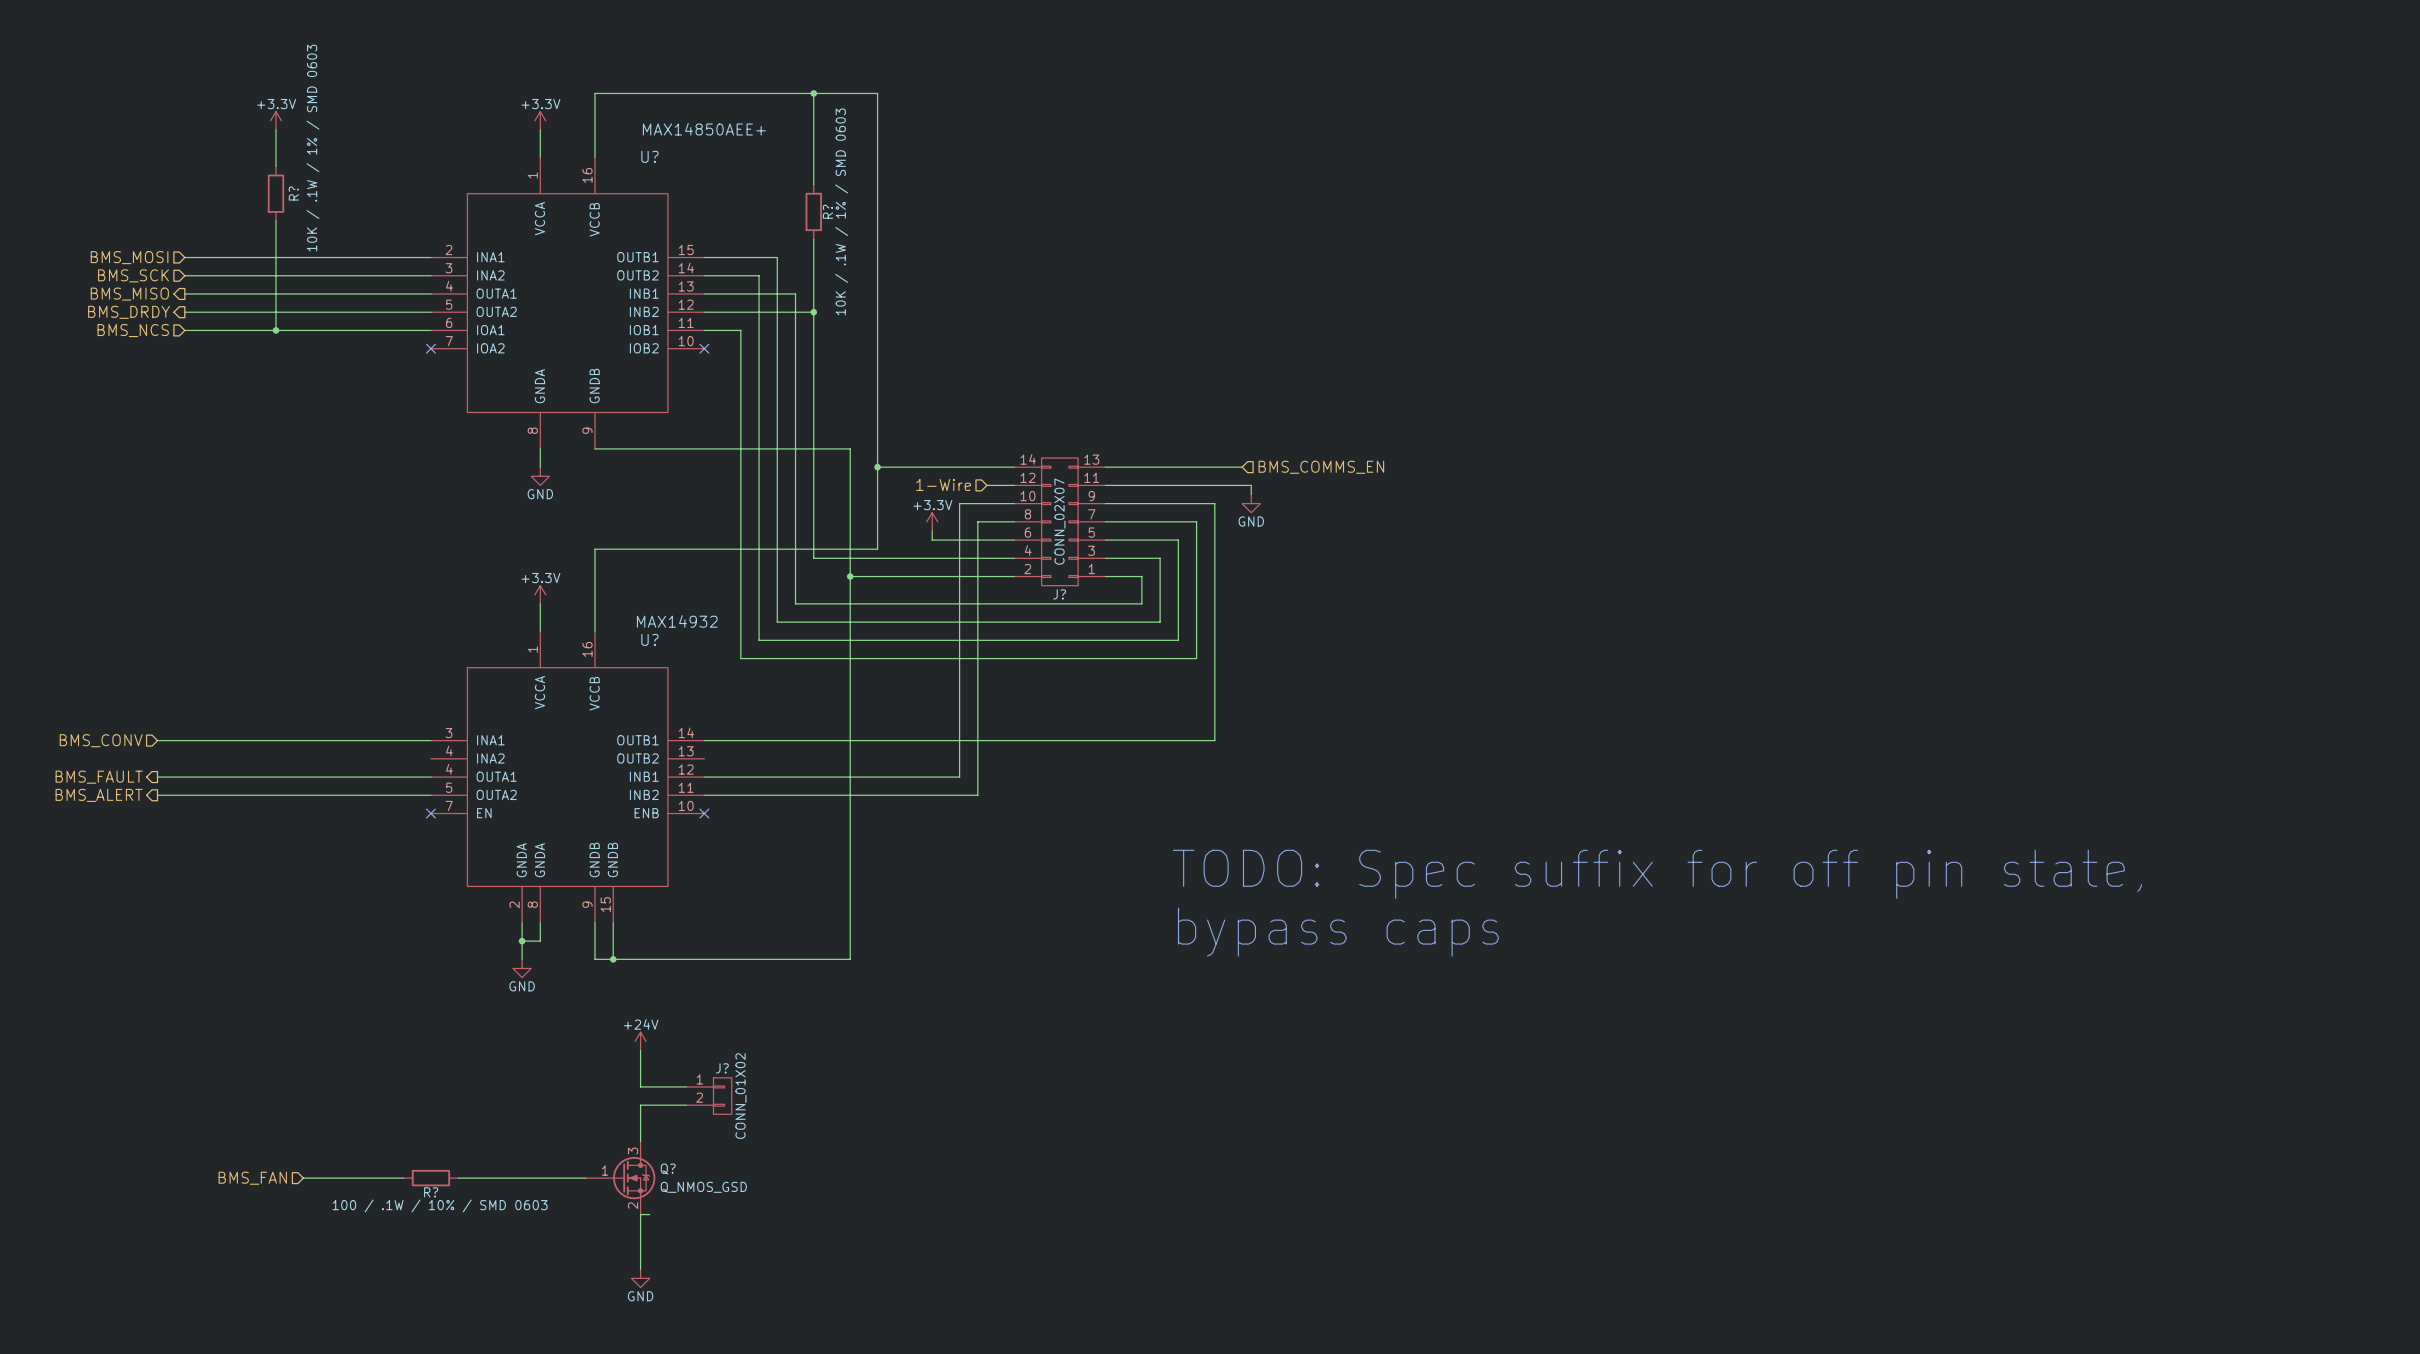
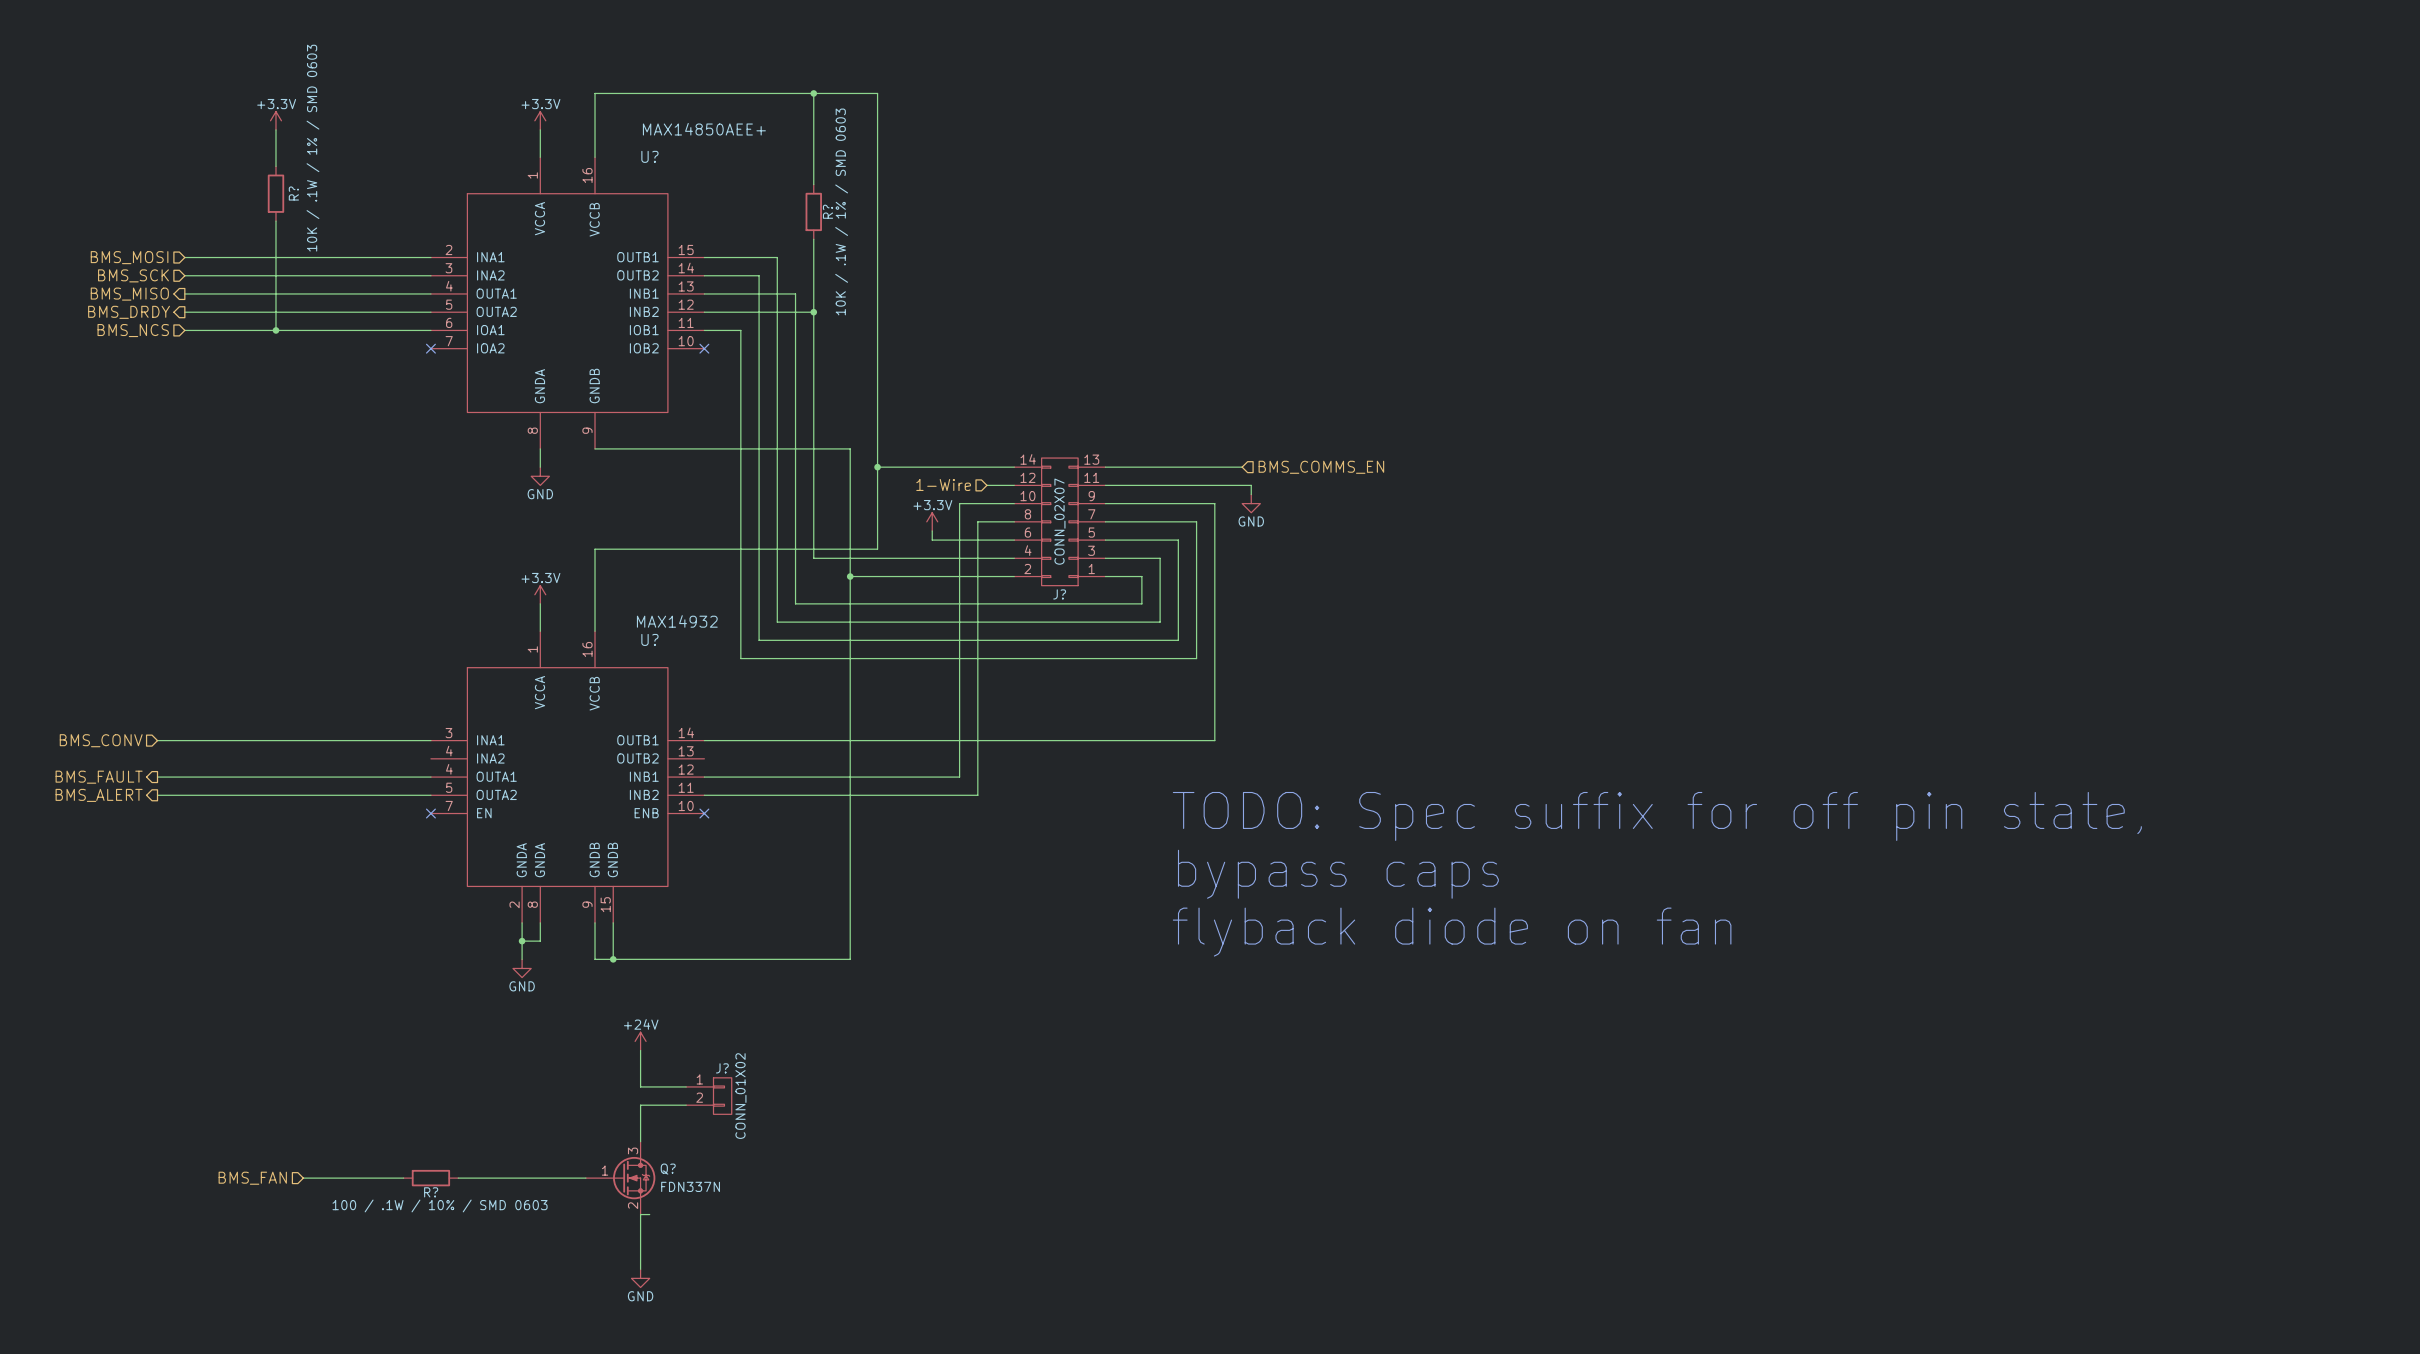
text: none -> TODO: Spec suffix for off pin state, (1657, 816)
text: TODO: Spec suffix for off pin state, (1657, 874) -> bypass caps (1338, 874)
text: bypass caps (1338, 932) -> flyback diode on fan (1452, 932)
Q? value: Q_NMOS_GSD (703, 1187) -> FDN337N (690, 1186)

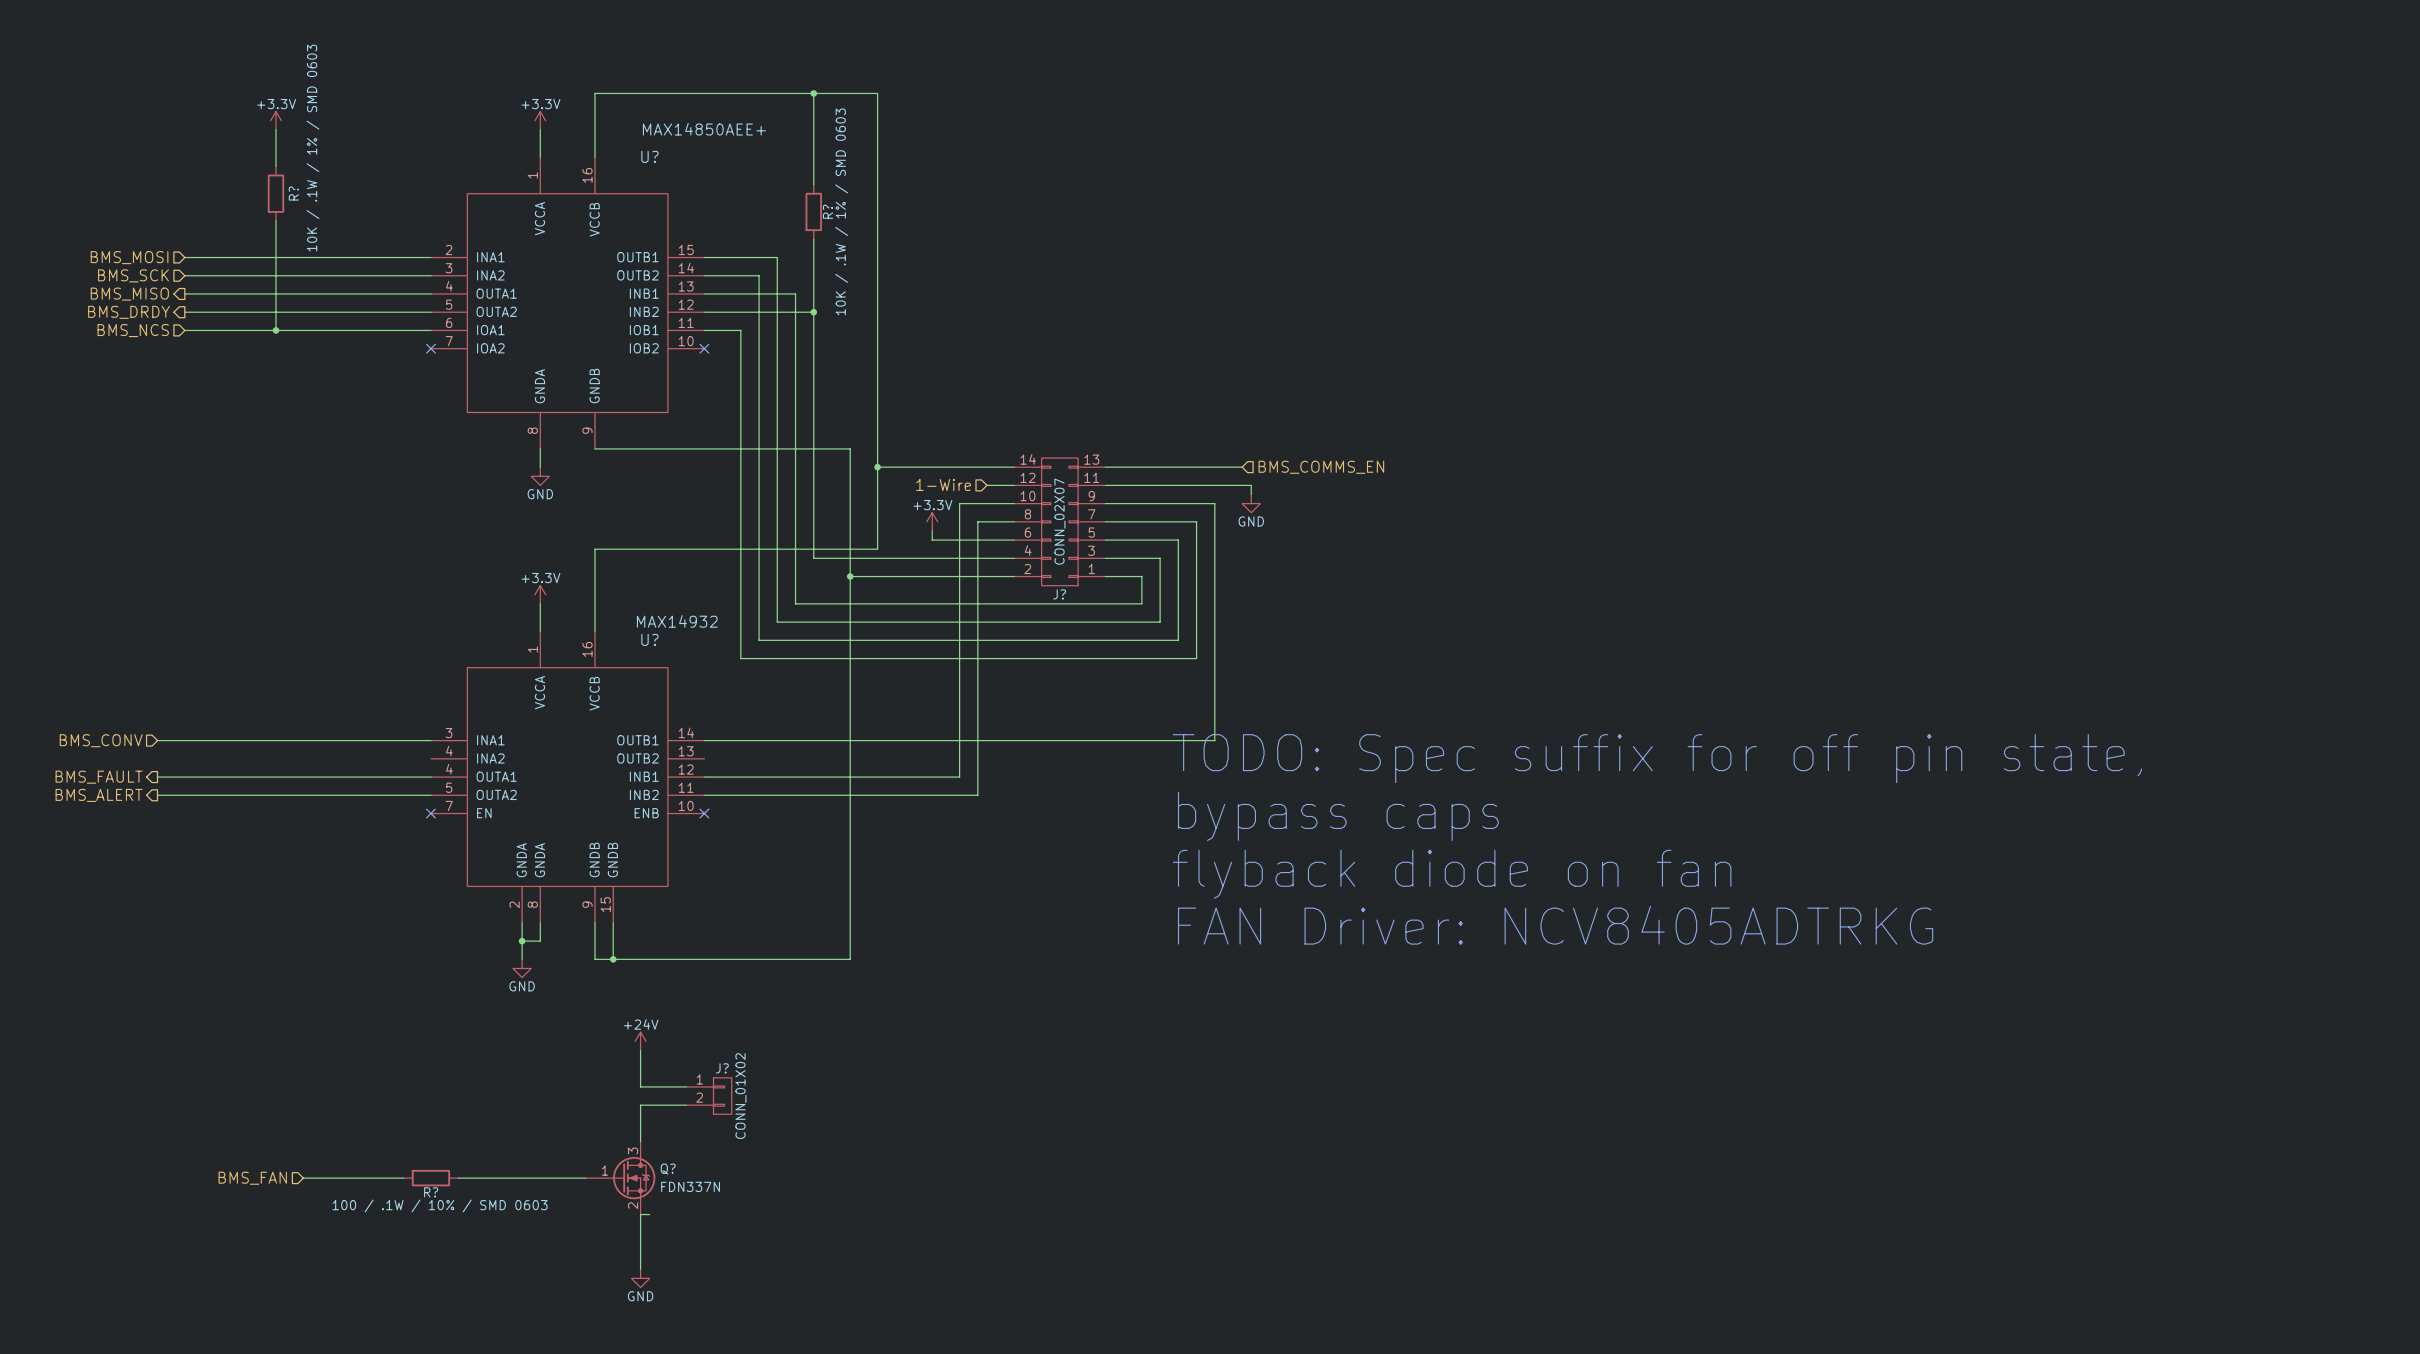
text: none -> TODO: Spec suffix for off pin state, (1657, 758)
text: TODO: Spec suffix for off pin state, (1657, 816) -> bypass caps (1338, 816)
text: bypass caps (1338, 874) -> flyback diode on fan (1452, 874)
text: flyback diode on fan (1452, 932) -> FAN Driver: NCV8405ADTRKG (1555, 925)

